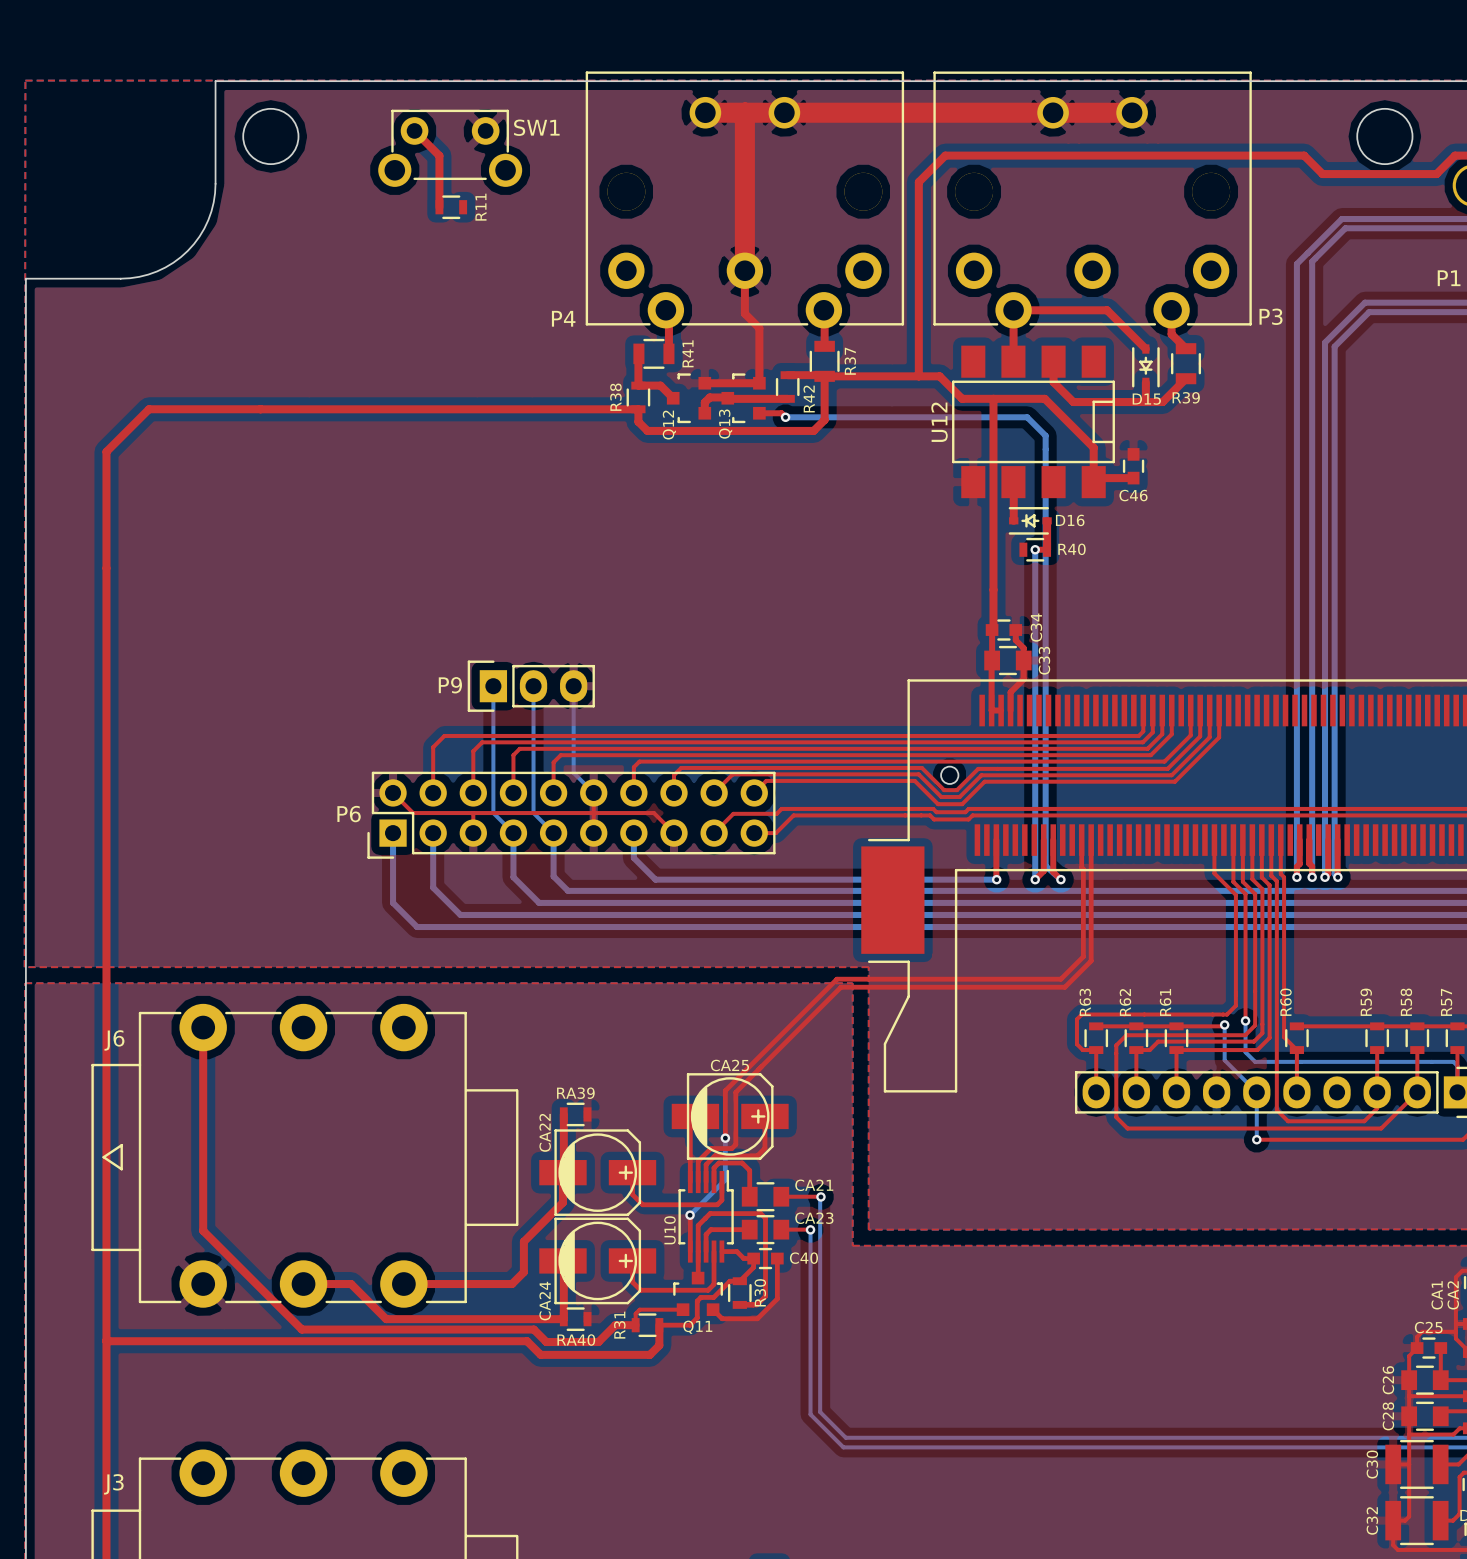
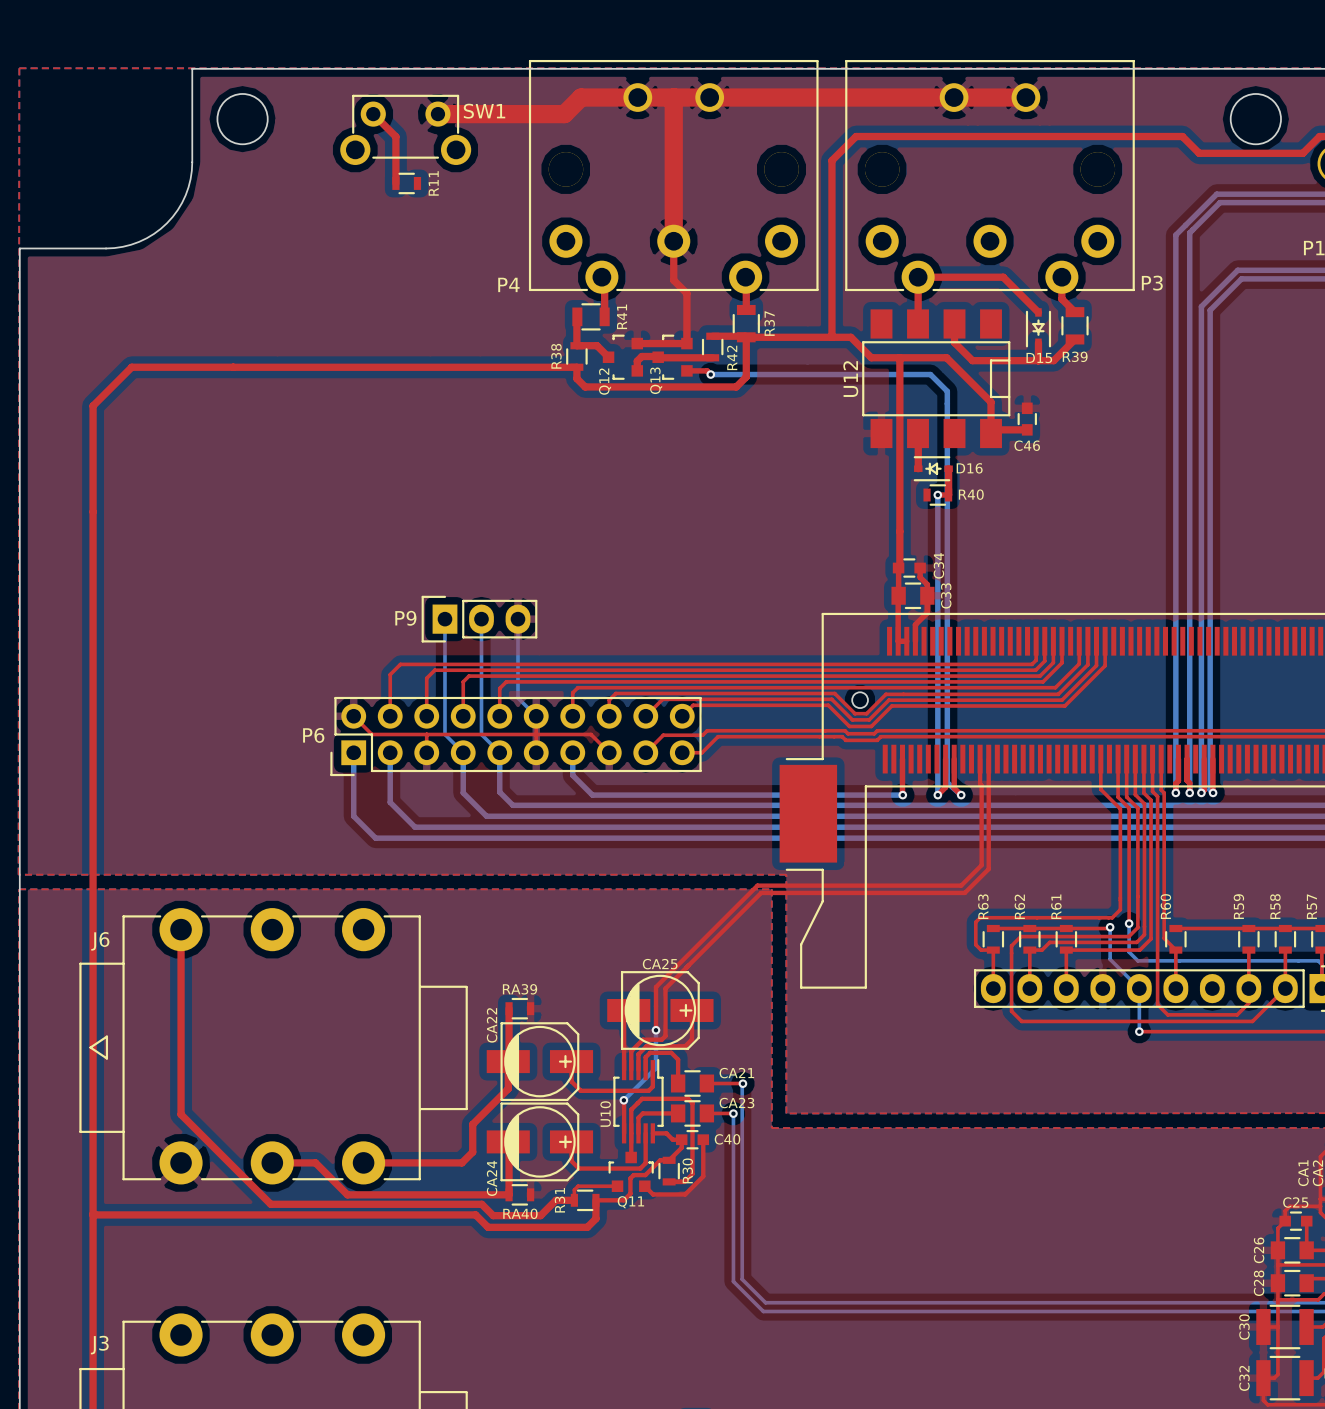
top track: none -> (637, 97) (581, 97) (564, 114) (437, 114)

